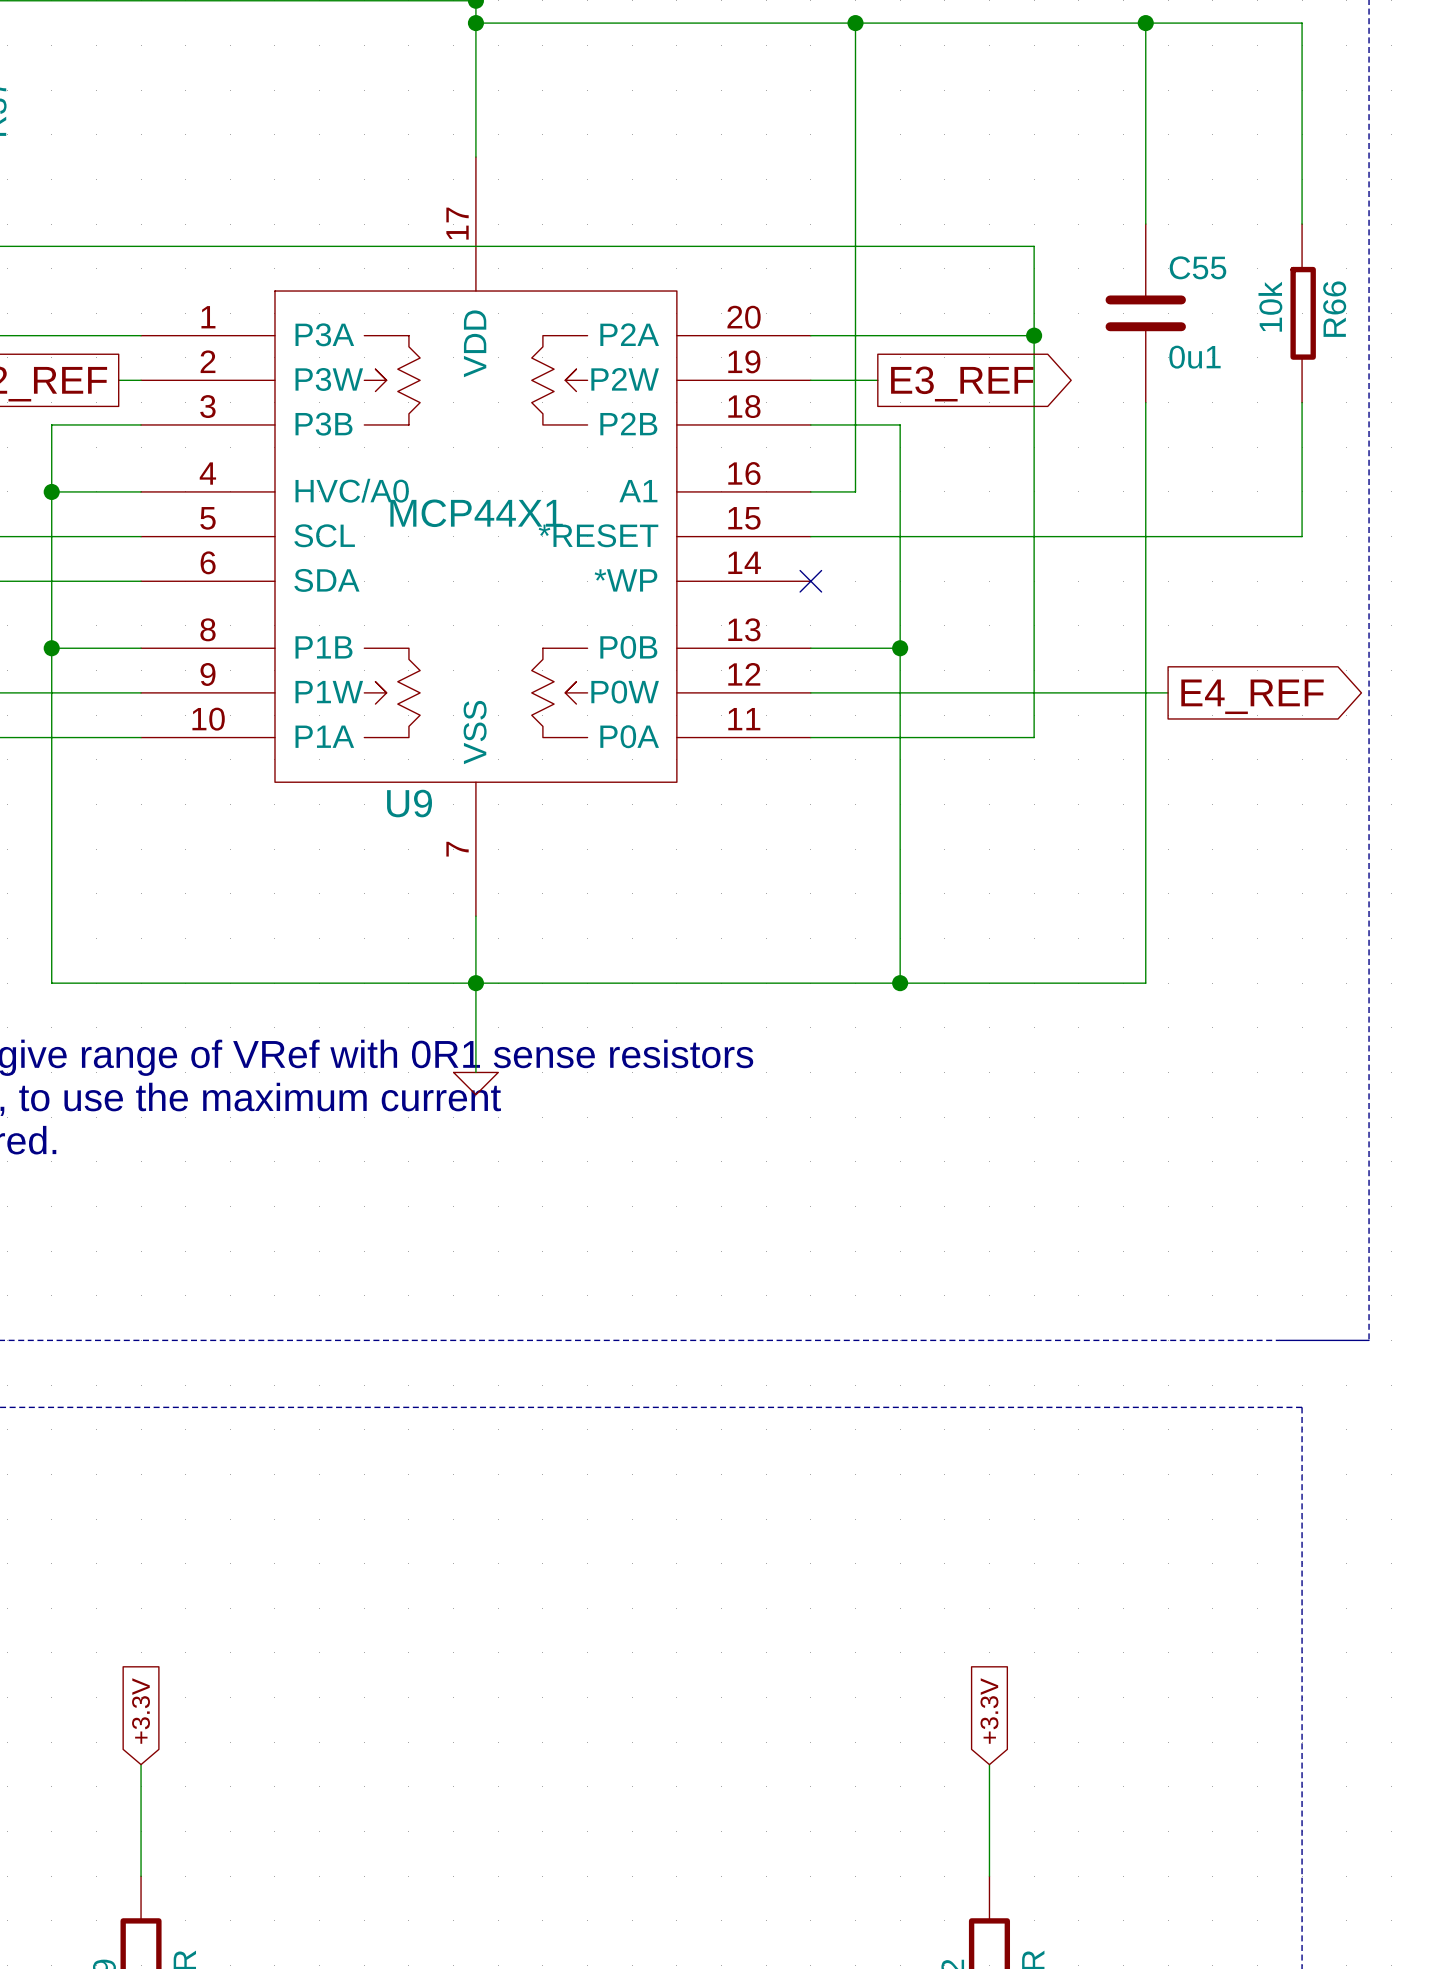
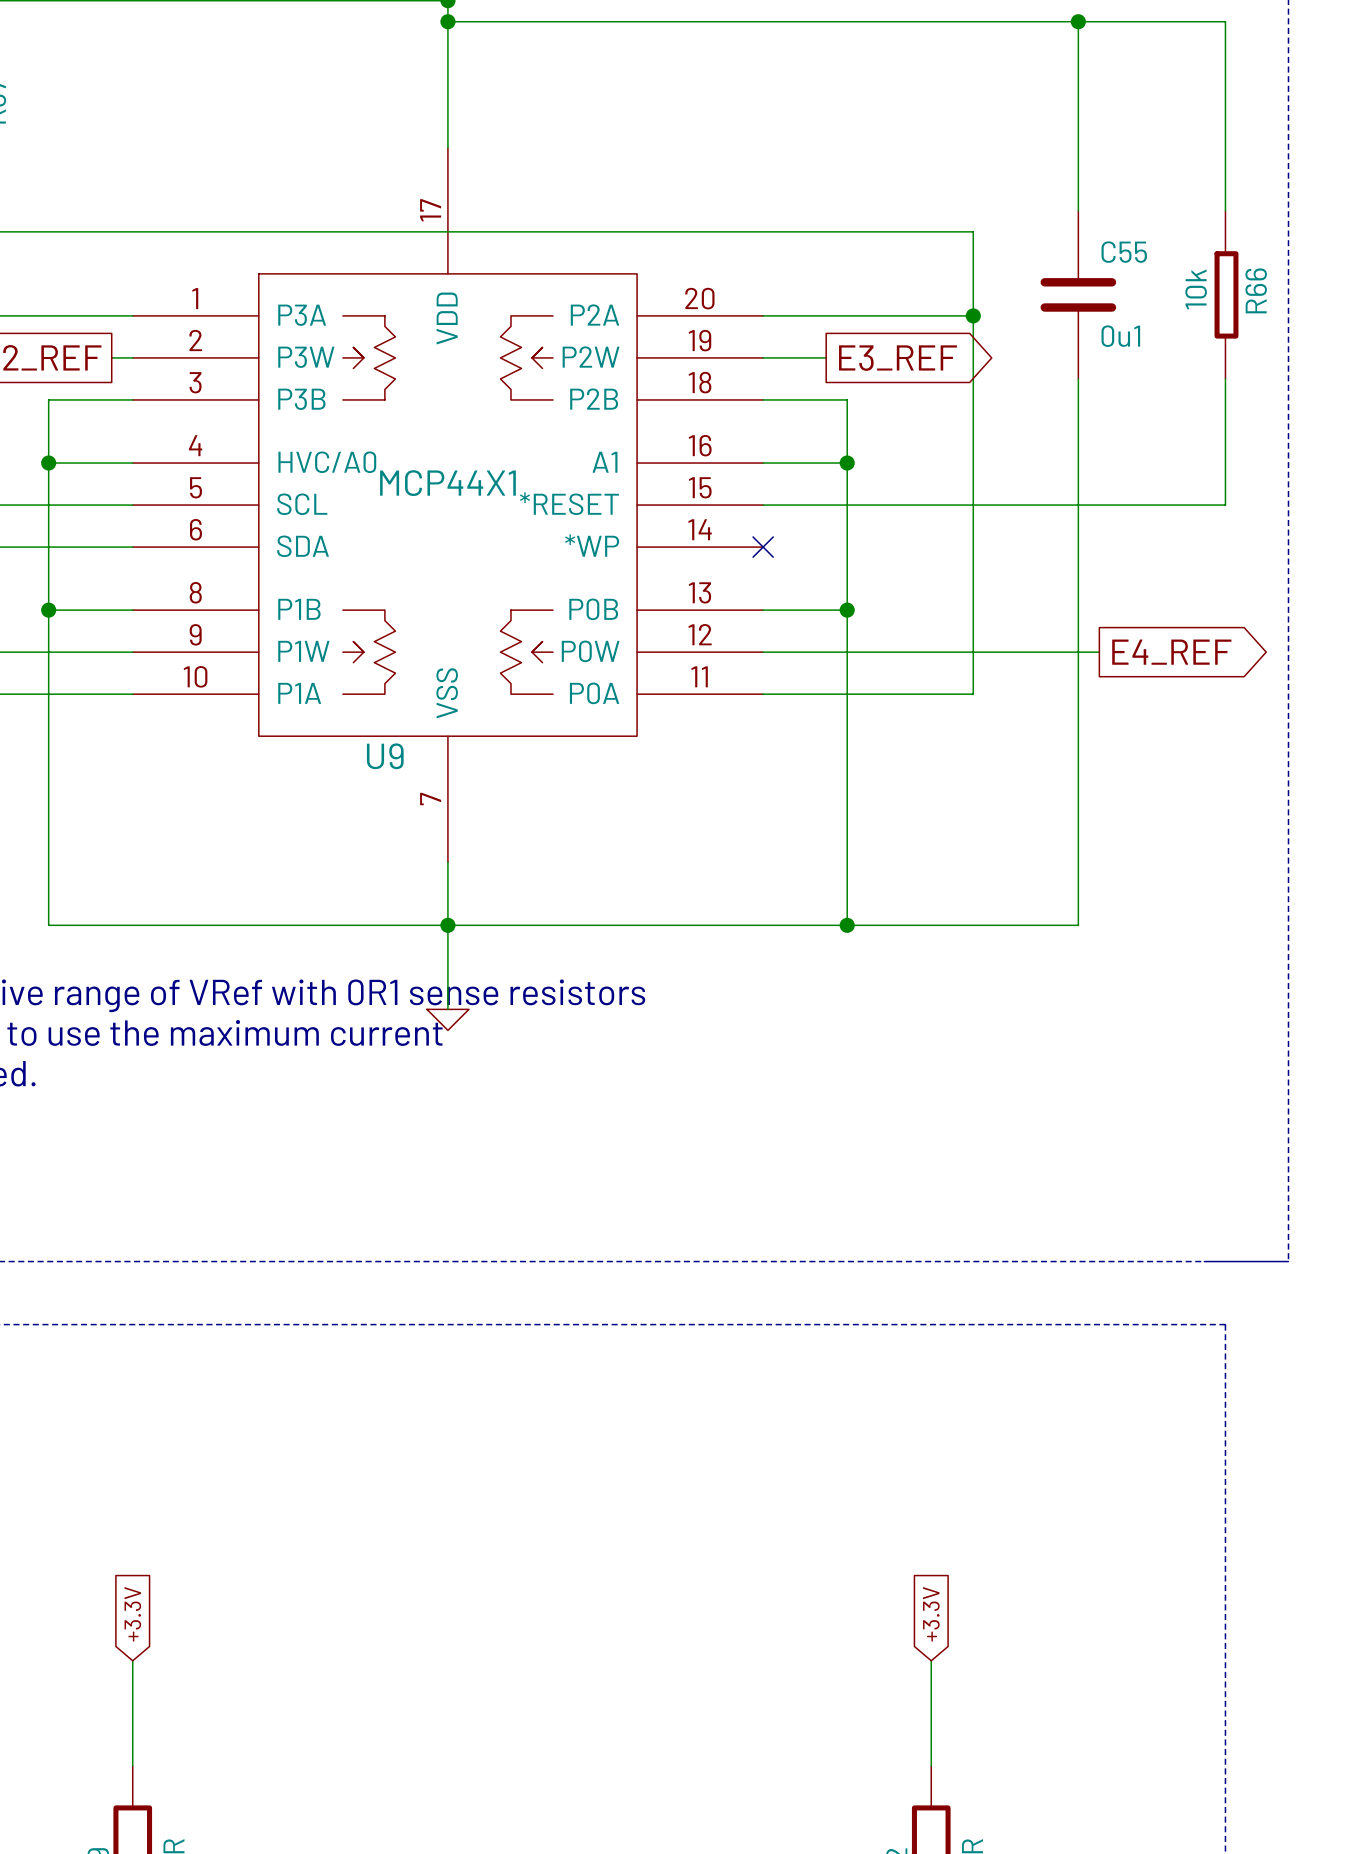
wire: (855, 23) (855, 491) -> (847, 463) (805, 463)
junction: (855, 23) -> none
junction: none -> (847, 463)

